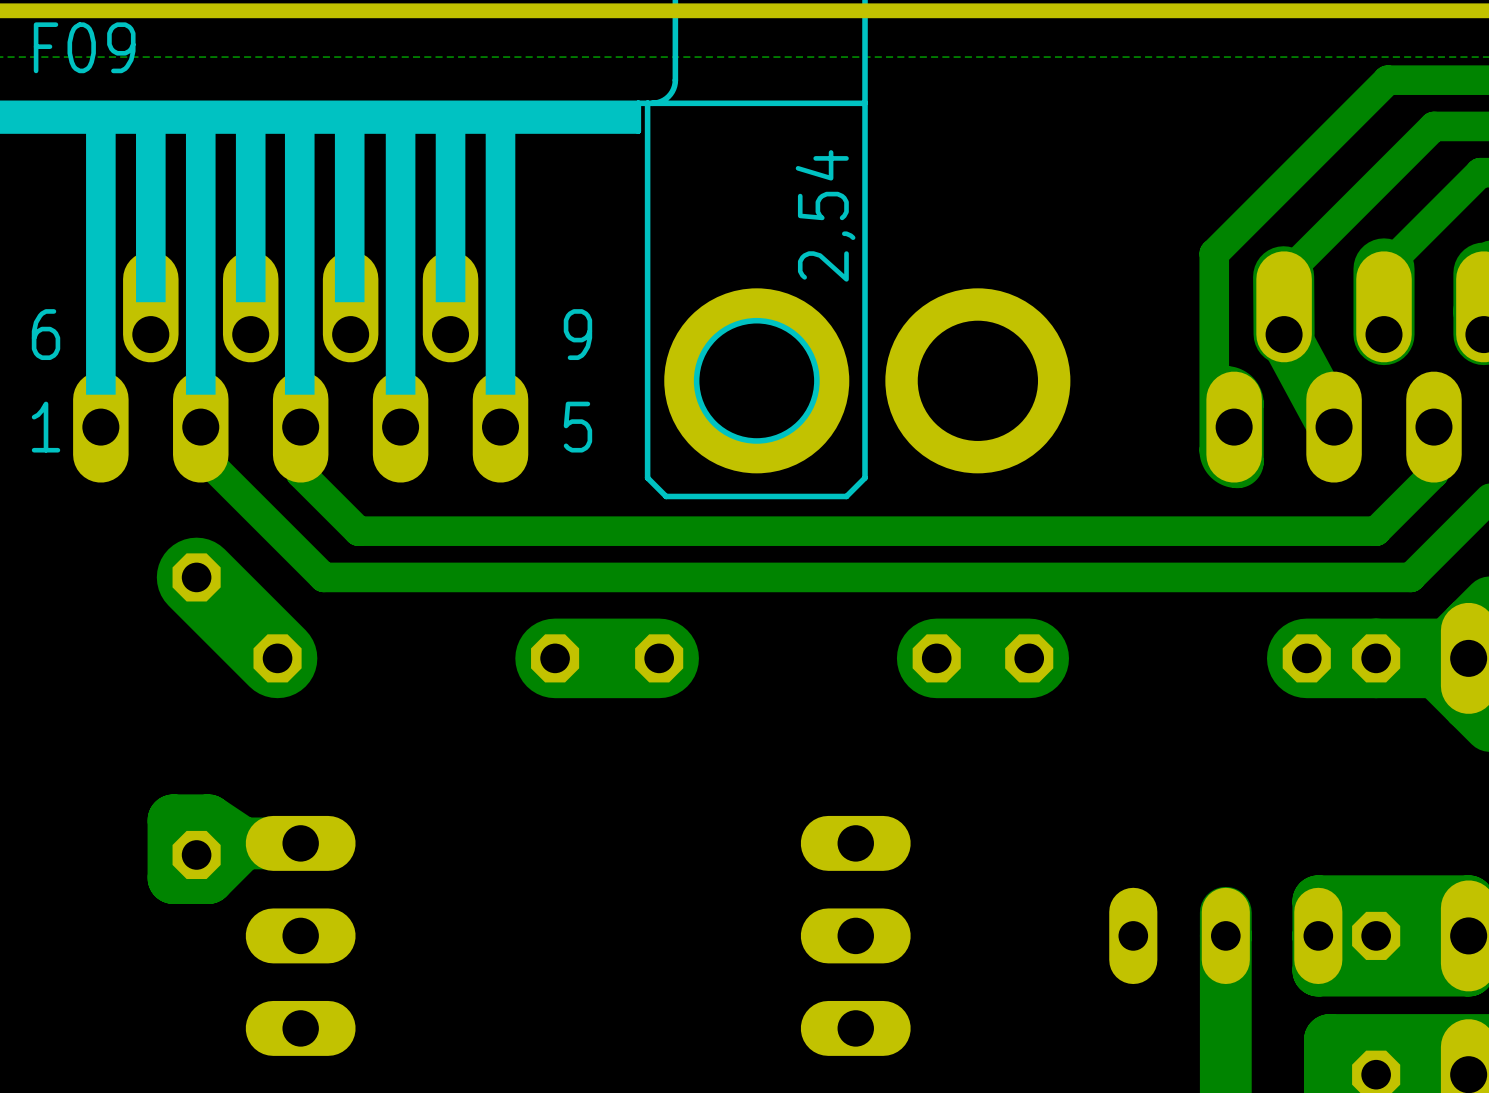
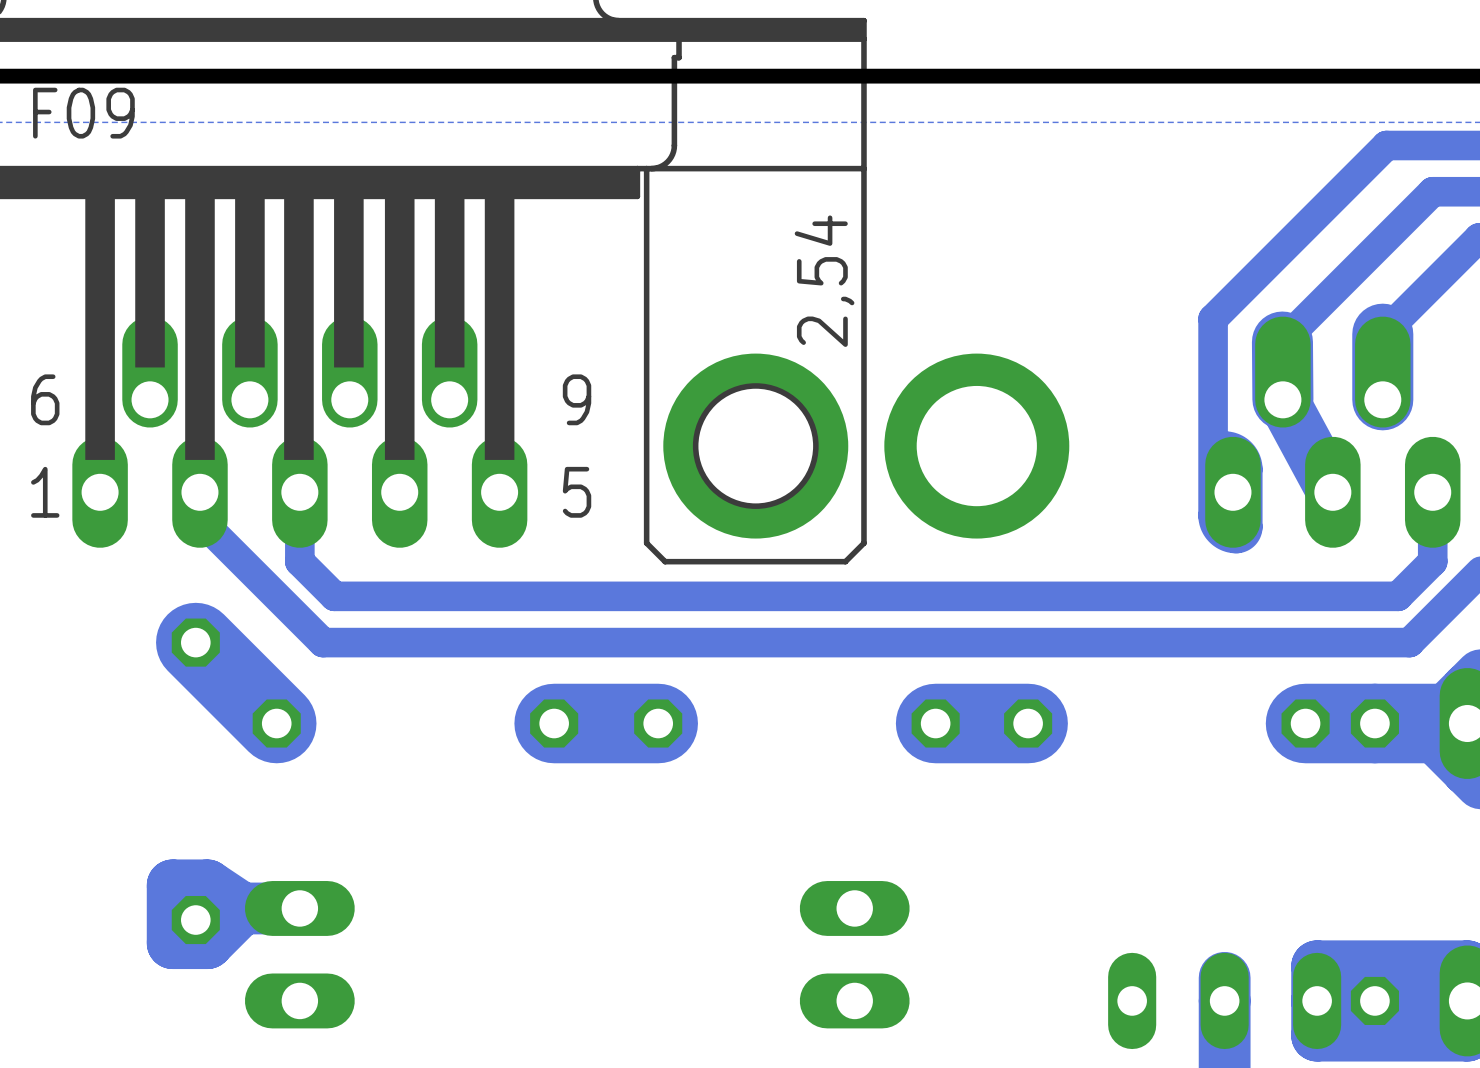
track: (300, 473) (358, 531) -> (299, 538) (299, 561) (334, 596) (357, 596)
track: (1433, 473) (1376, 531) -> (1432, 538) (1432, 561) (1398, 596) (1374, 596)

